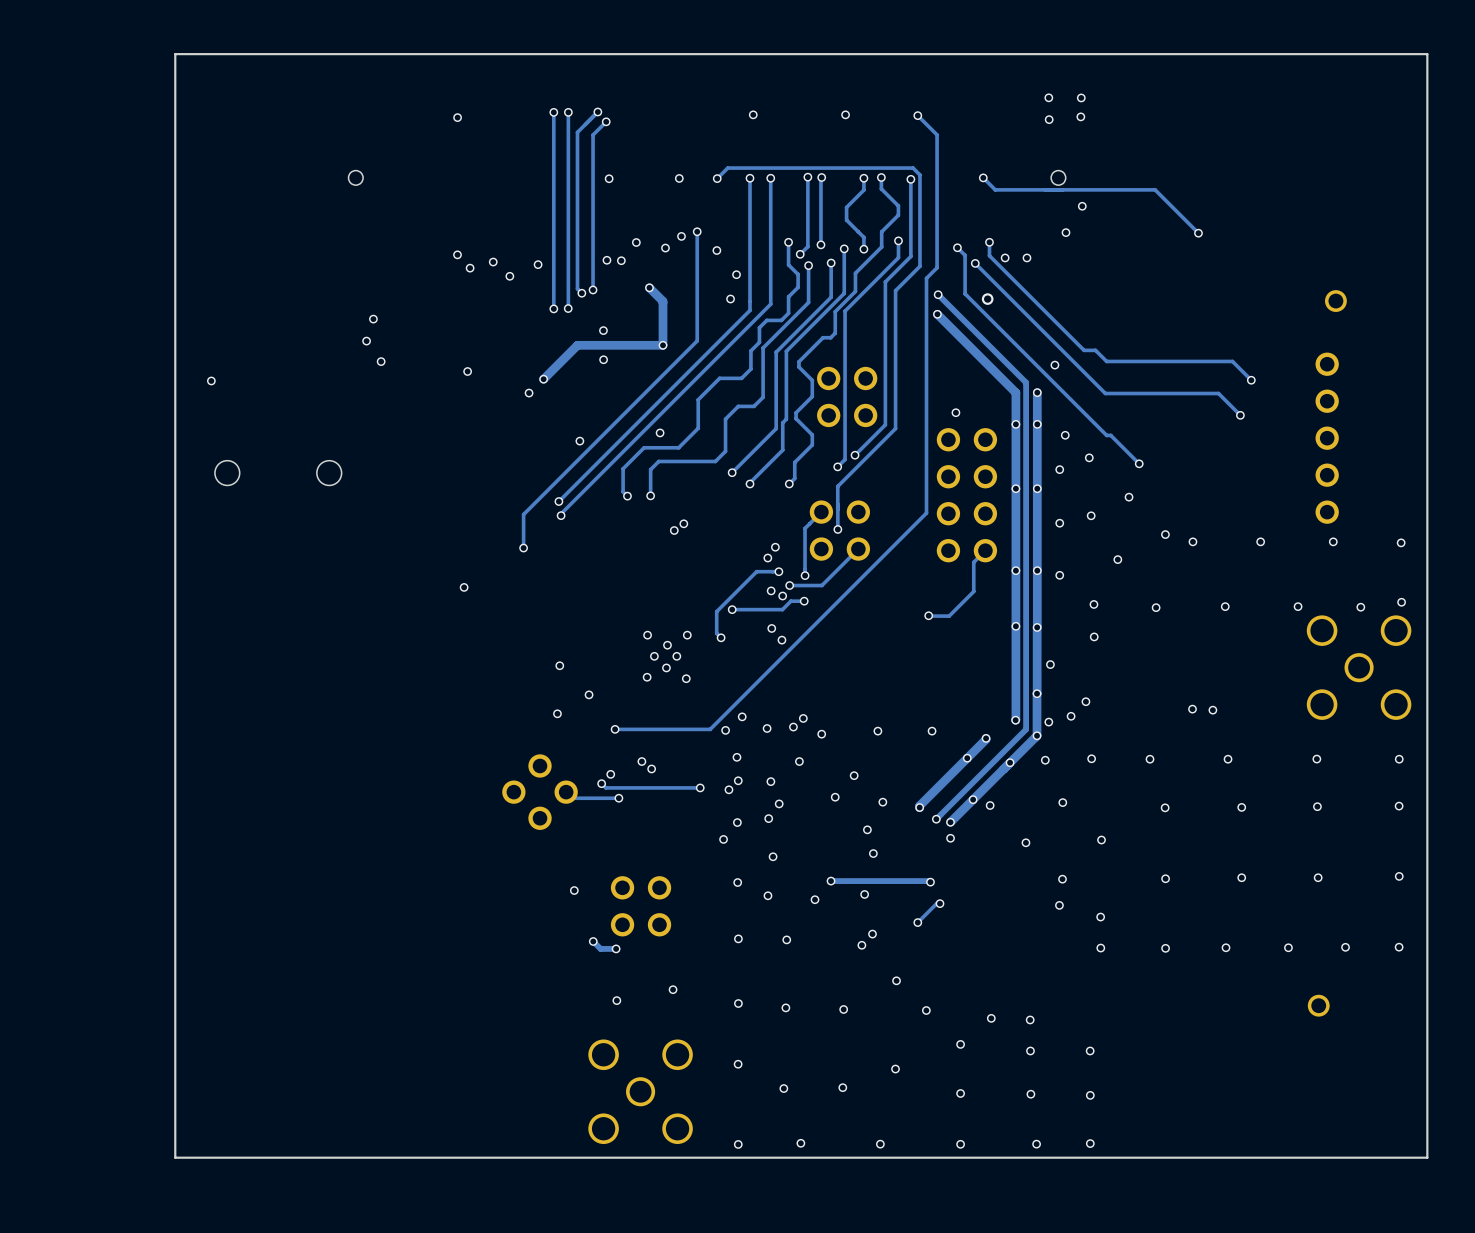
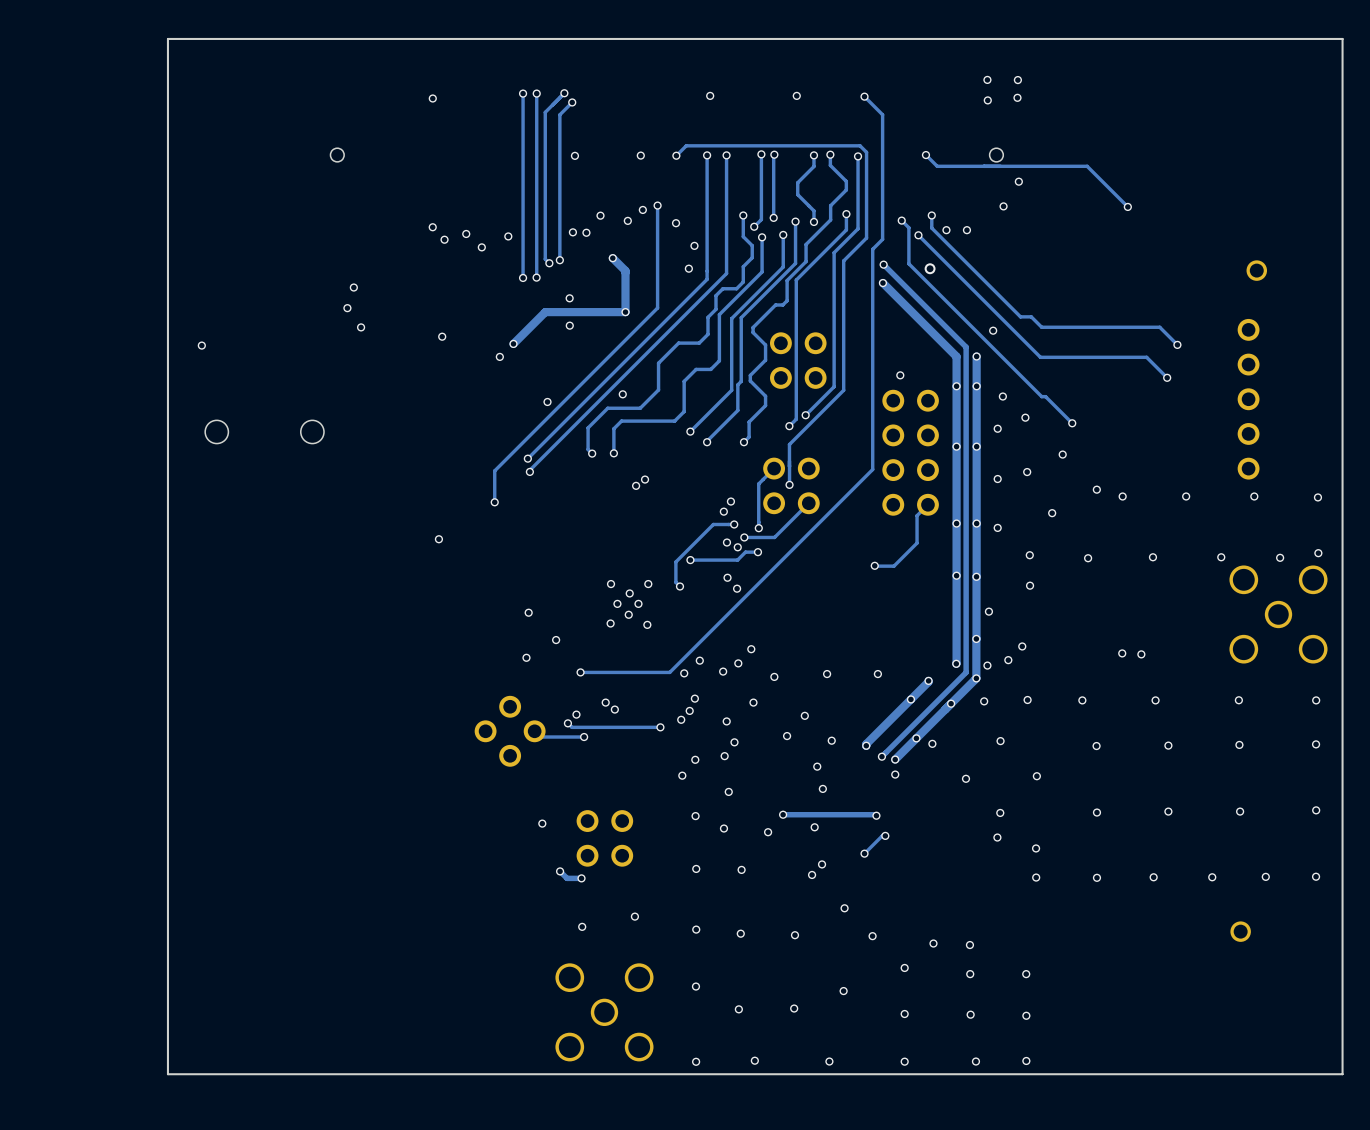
via: none -> (751, 649)
via: (803, 718) -> none
via: none -> (738, 663)
via: (793, 727) -> none
via: none -> (689, 710)
via: none -> (681, 719)
via: (738, 780) -> none
via: (728, 789) -> none

